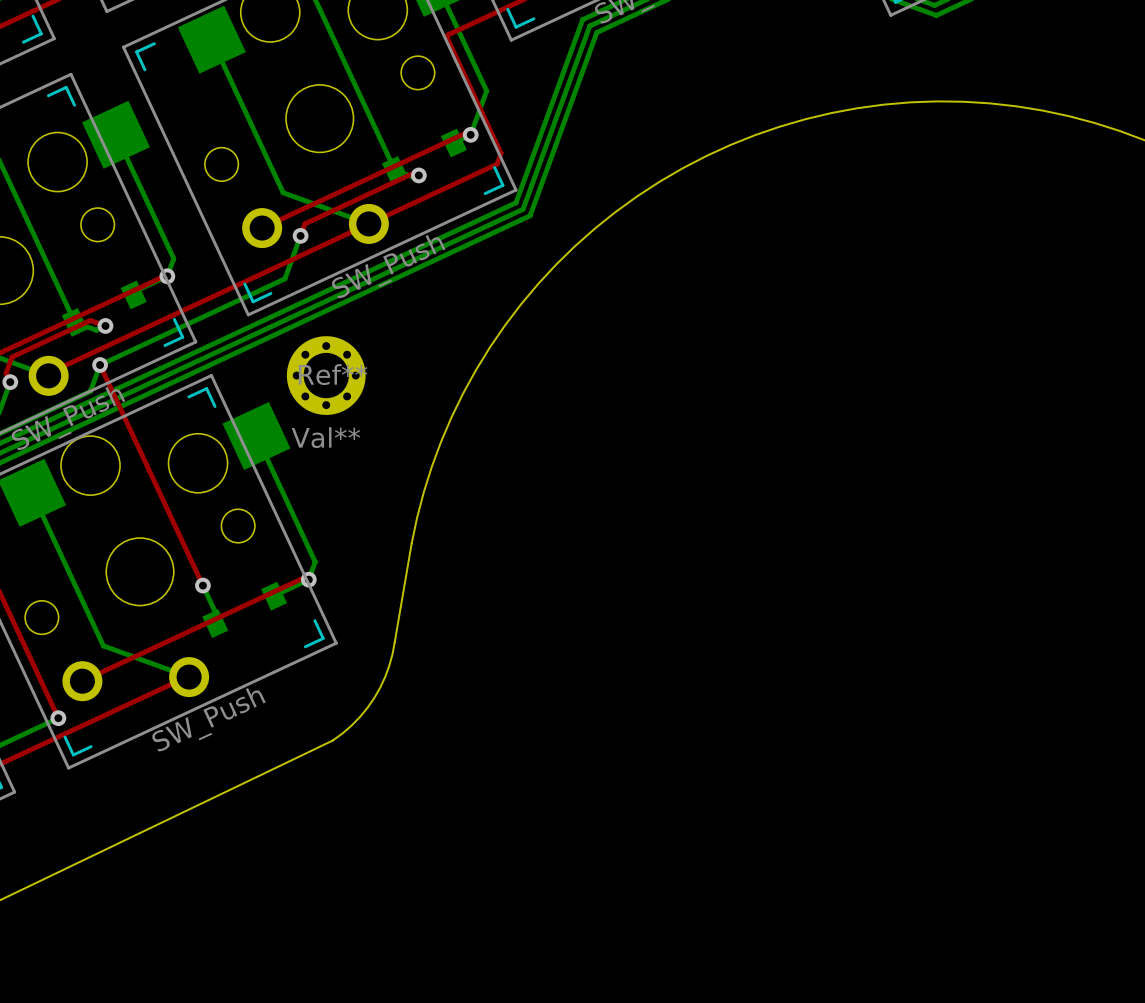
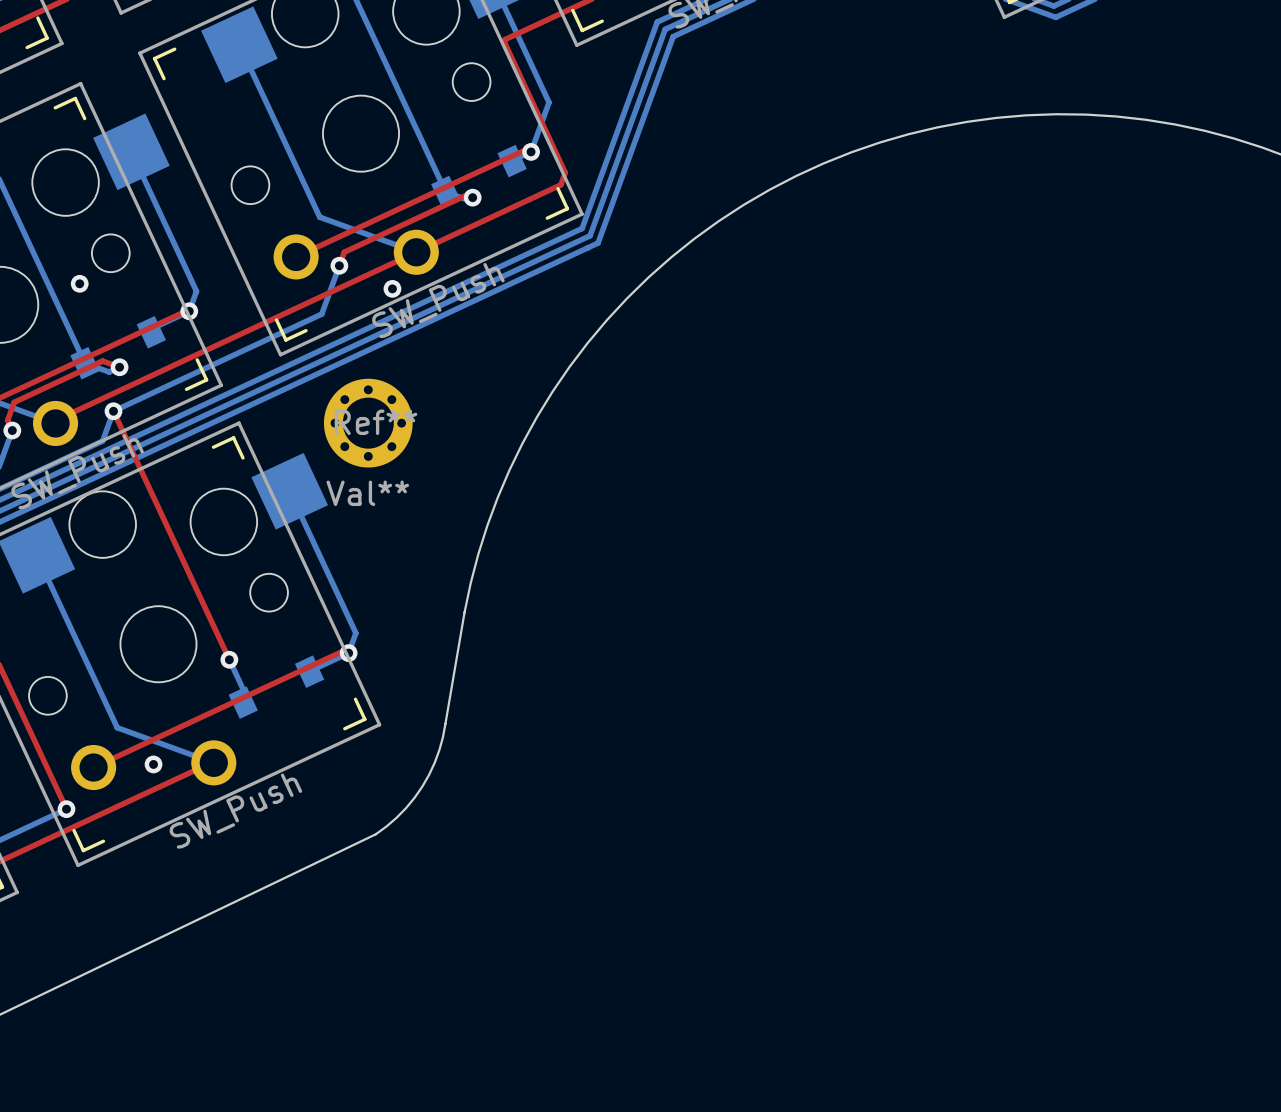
via: none -> (79, 283)
via: none -> (392, 288)
via: none -> (153, 764)

